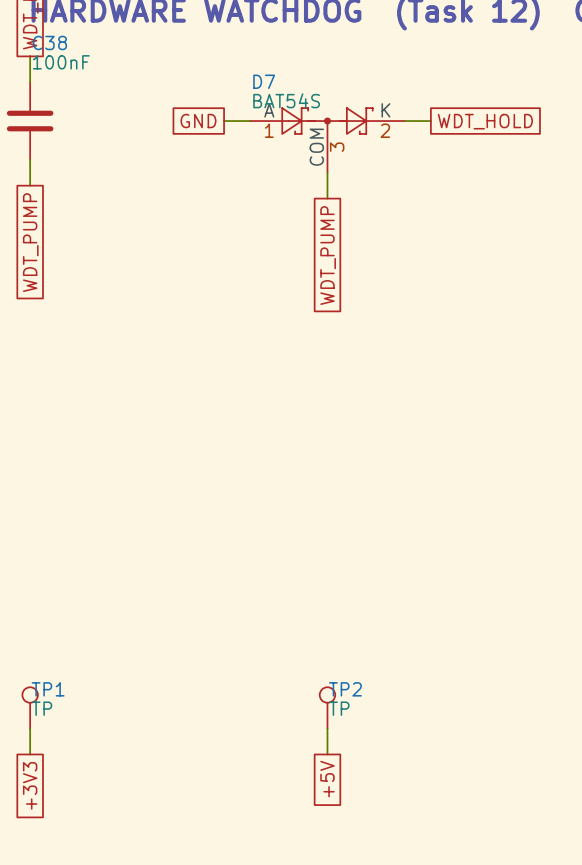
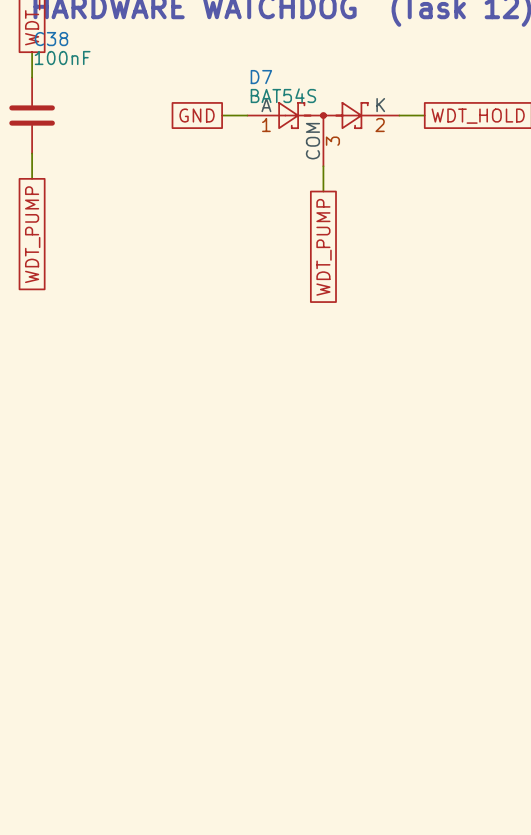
TP1: TP (30, 707) -> none
TP2: TP (327, 707) -> none
wire: (30, 728) (30, 754) -> none
wire: (327, 728) (327, 754) -> none
global label: +5V (327, 779) -> none
global label: +3V3 (30, 785) -> none

